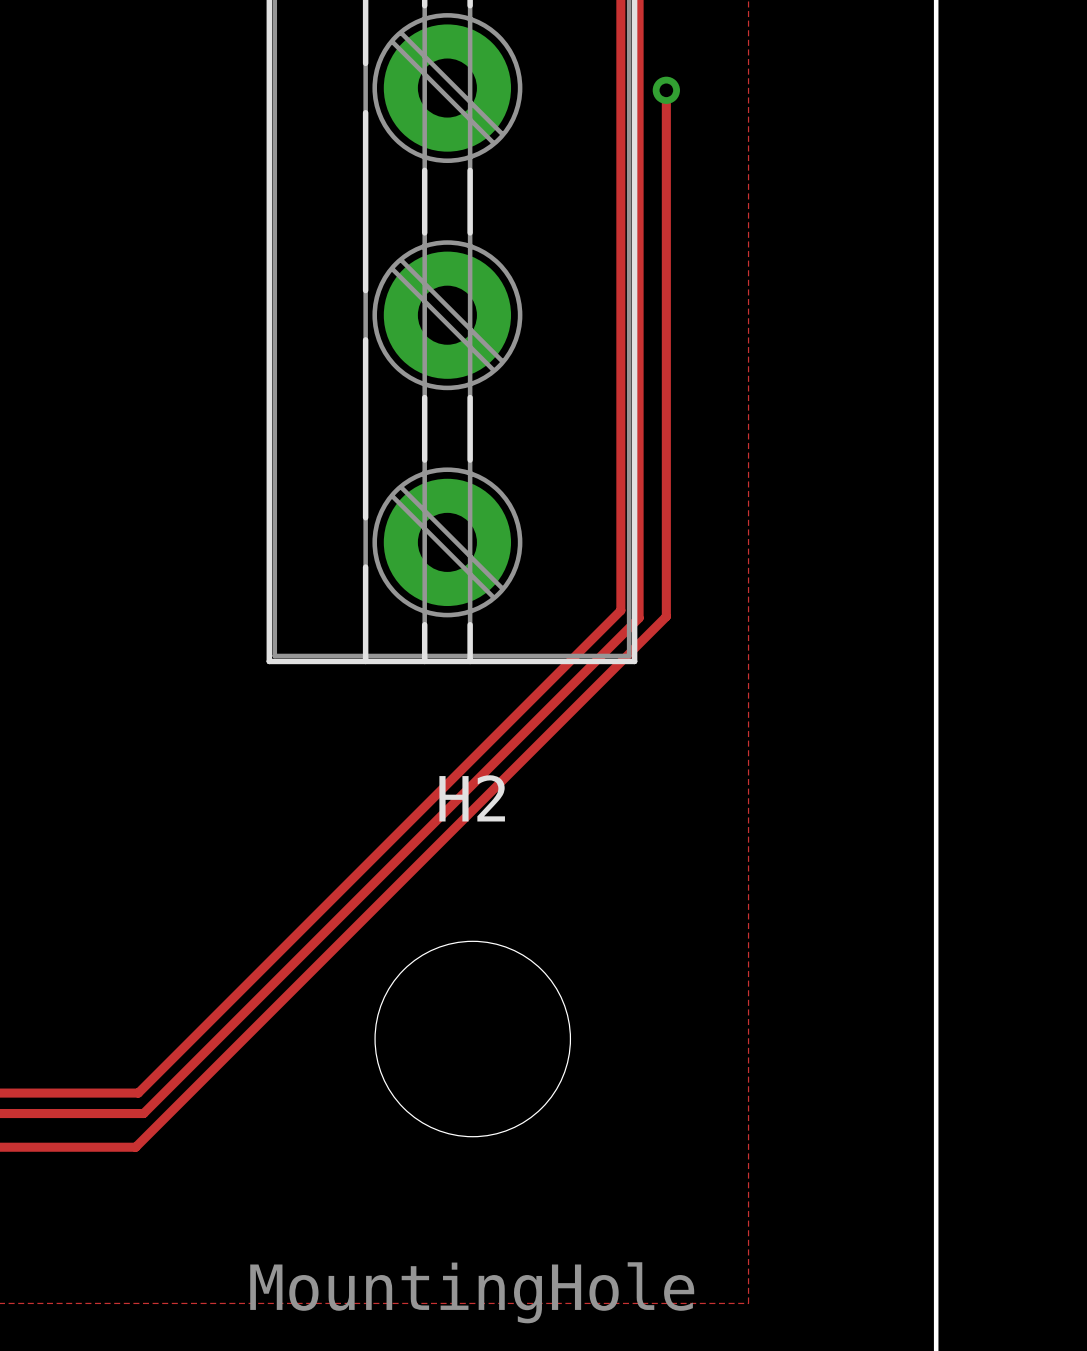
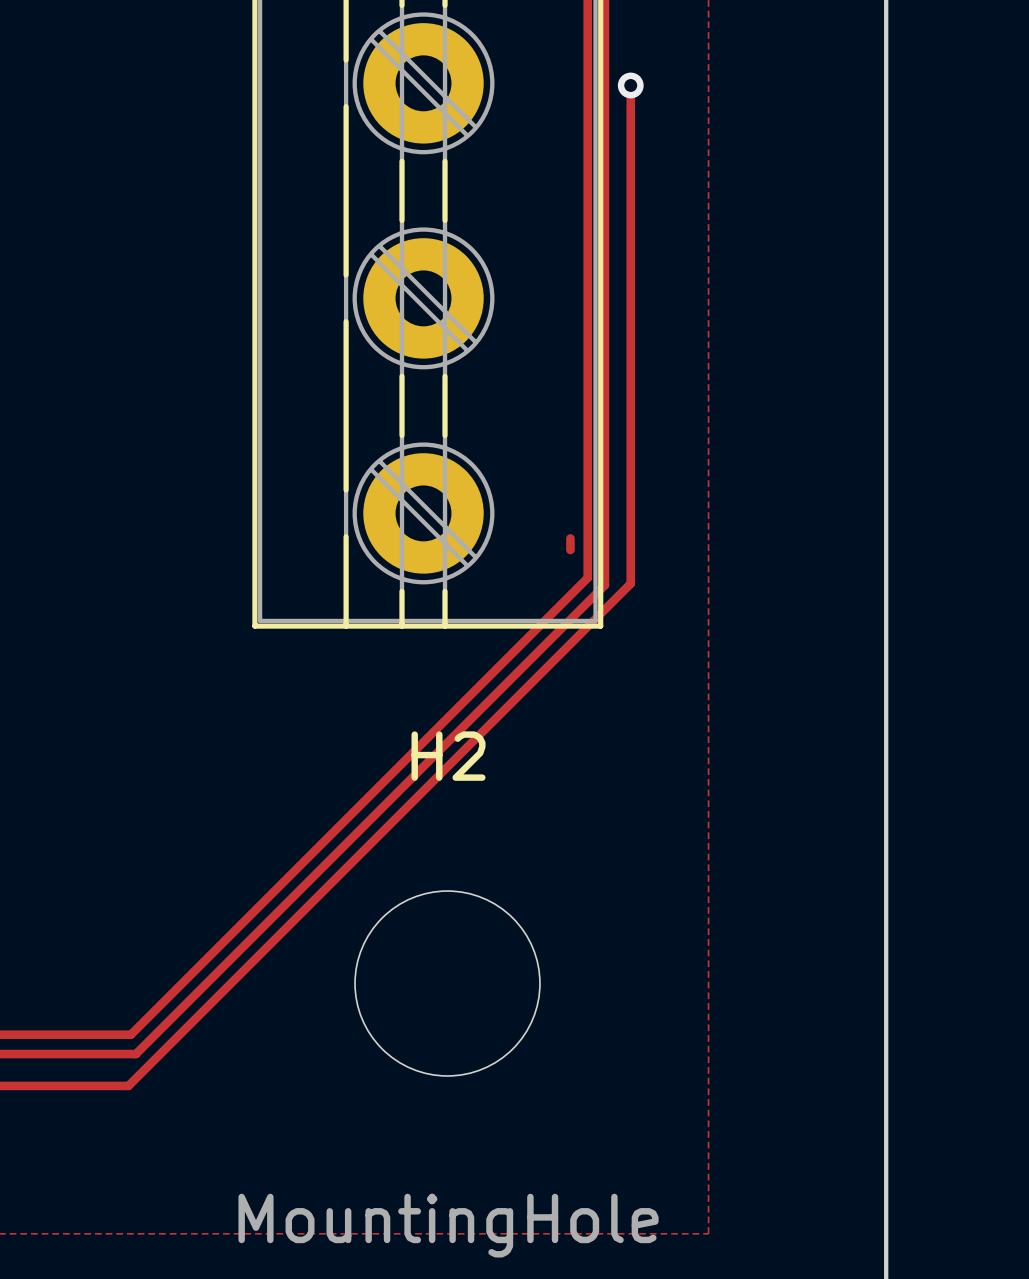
track: none -> (570, 538) (570, 550)

